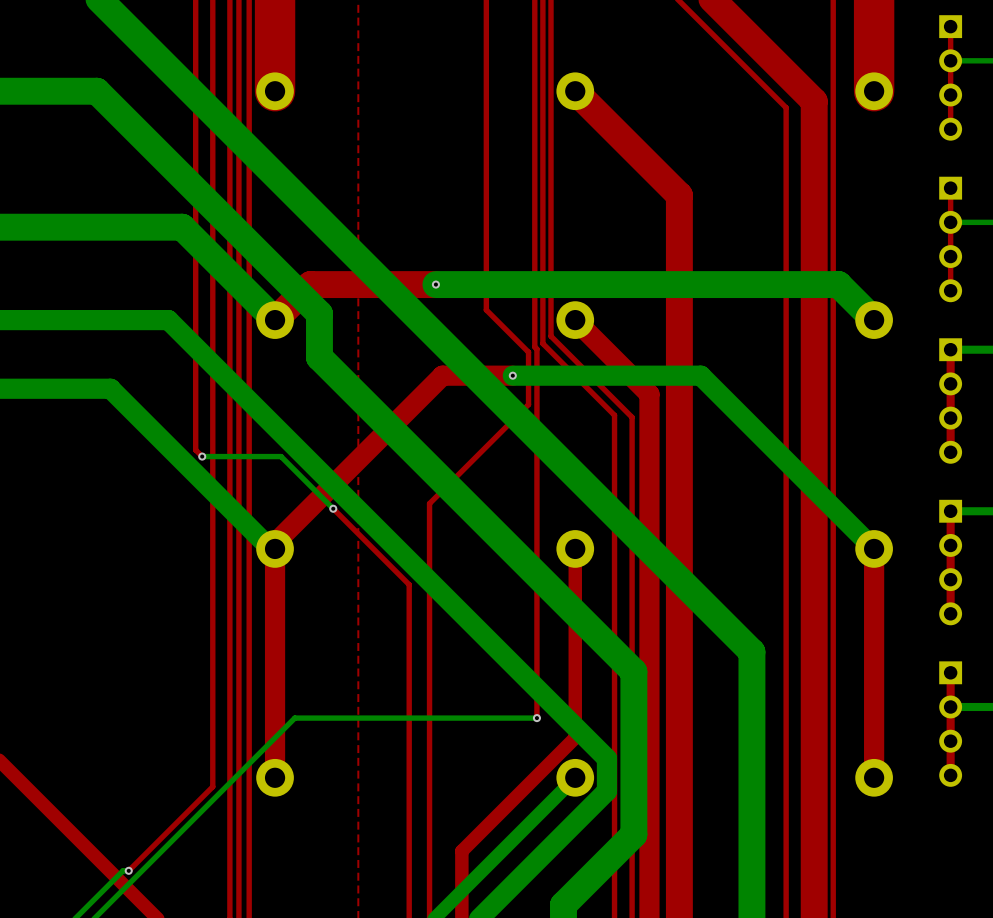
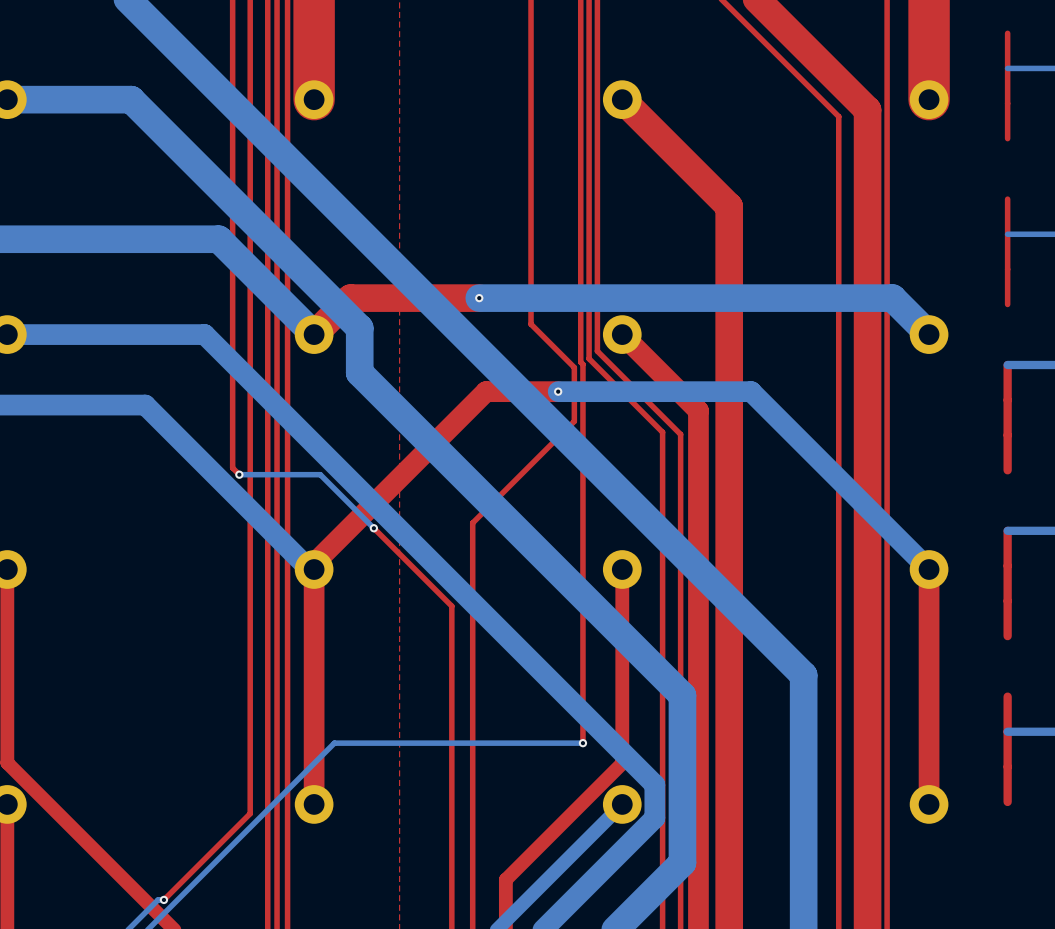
part: (950, 77) -> none
part: (950, 239) -> none
part: (950, 401) -> none
part: (950, 562) -> none
part: (950, 724) -> none

